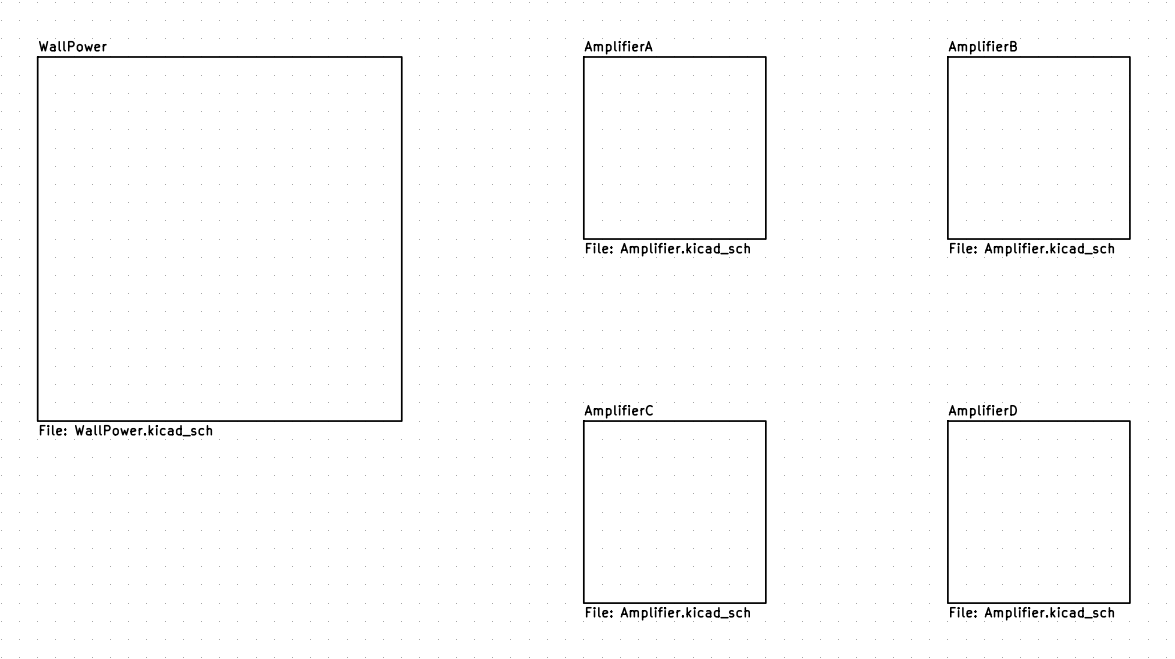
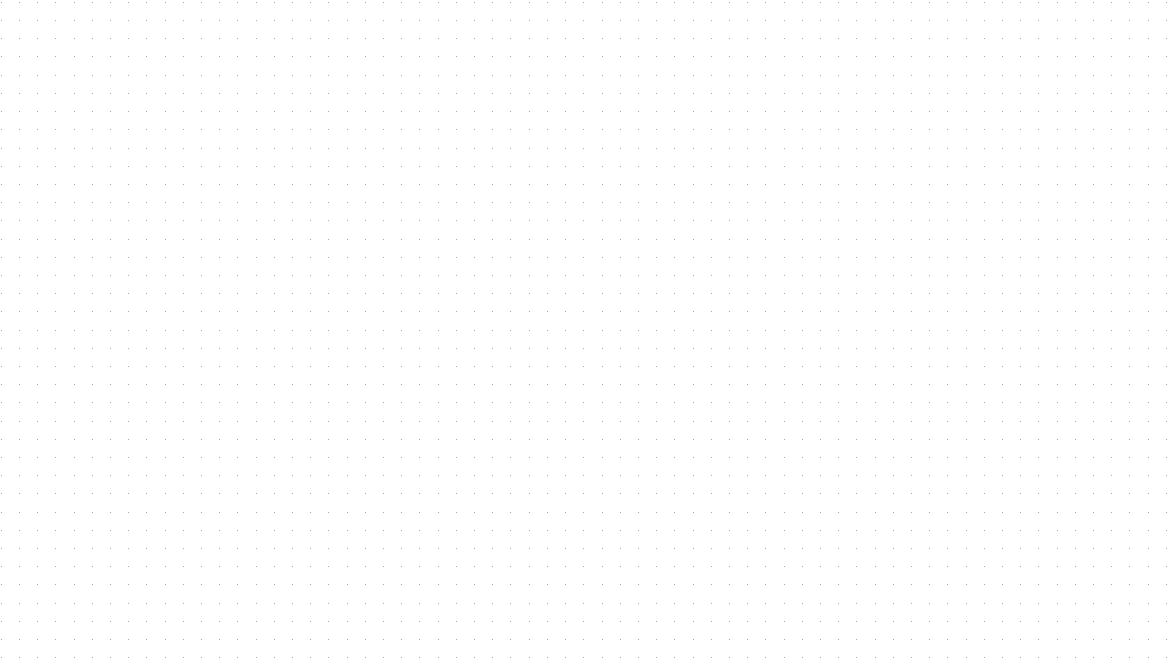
sheet AmplifierA: File: Amplifier.kicad_sch (674, 148) -> none
sheet AmplifierB: File: Amplifier.kicad_sch (1038, 148) -> none
sheet WallPower: File: WallPower.kicad_sch (219, 239) -> none
sheet AmplifierC: File: Amplifier.kicad_sch (674, 512) -> none
sheet AmplifierD: File: Amplifier.kicad_sch (1038, 512) -> none

